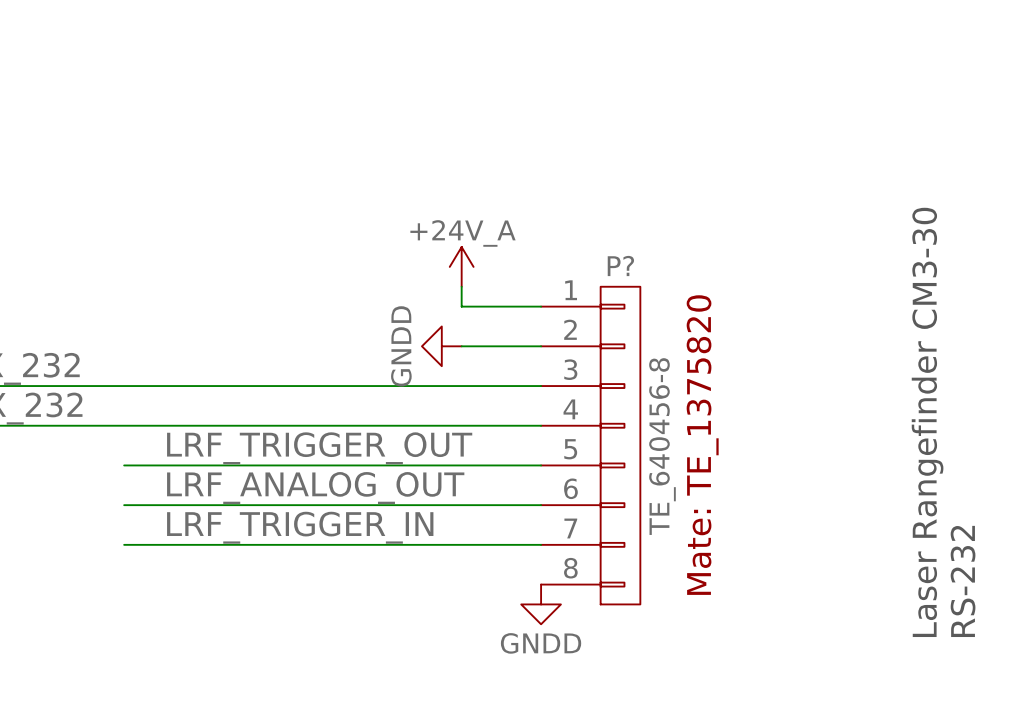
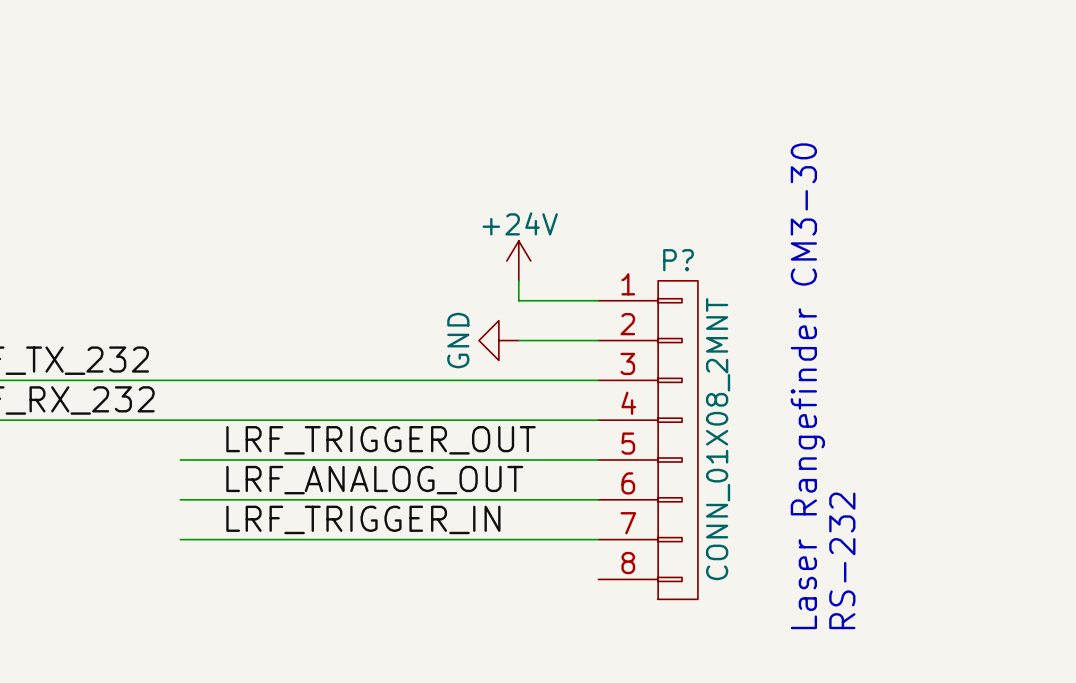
power symbol: +24V_A (461, 266) -> +24V (518, 260)
power symbol: GNDD (441, 346) -> GND (498, 340)
text position: Laser Rangefinder CM3-30 (927, 422) -> Laser Rangefinder CM3-30 (807, 386)
P? text: Mate: TE_1375820 (702, 445) -> none
P? value: TE_640456-8 (662, 446) -> CONN_01X08_2MNT (718, 439)
text position: RS-232 (963, 581) -> RS-232 (842, 560)
power symbol: GNDD (541, 604) -> none

